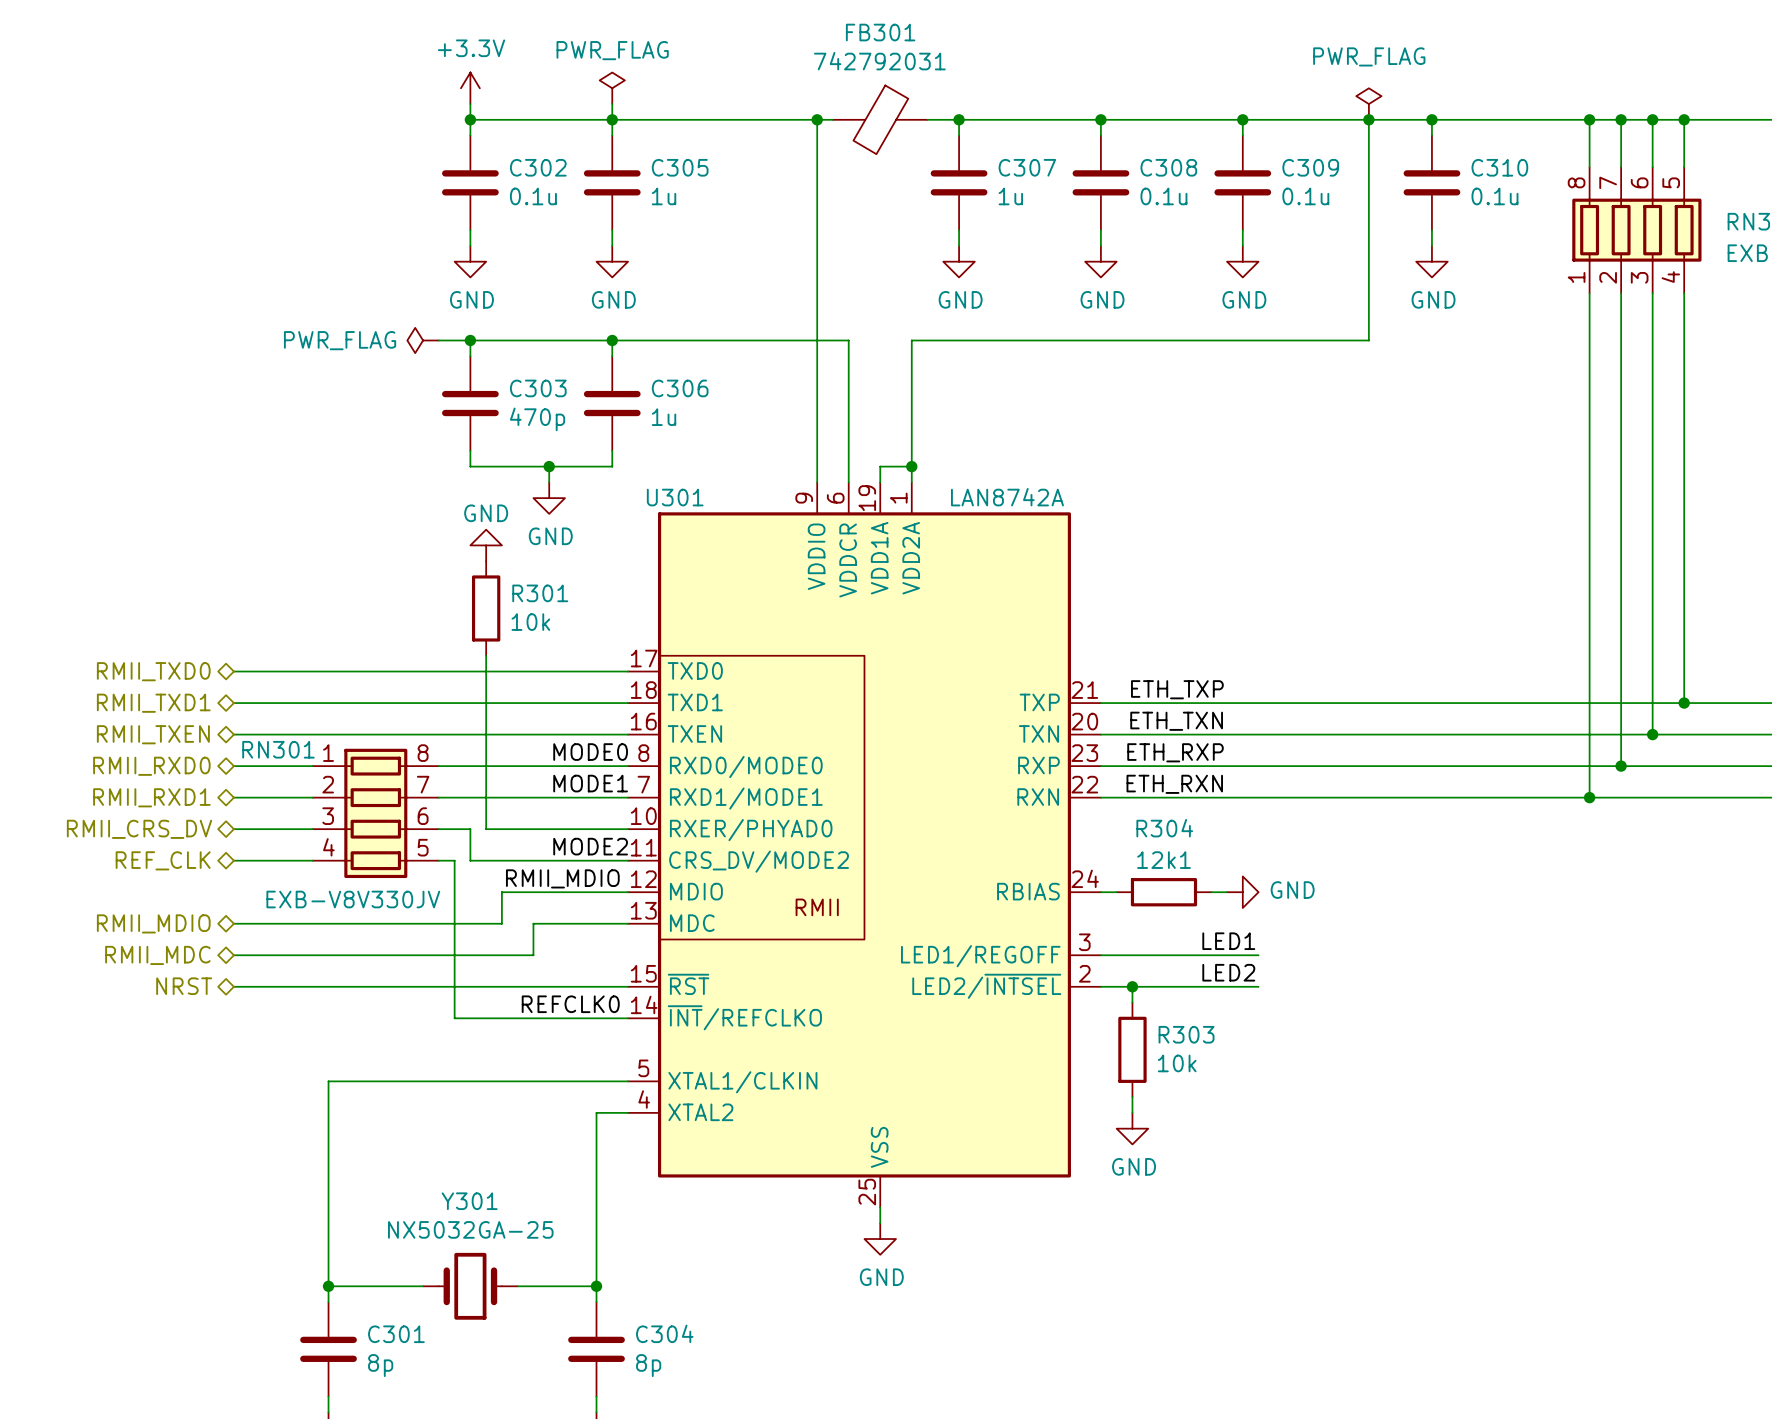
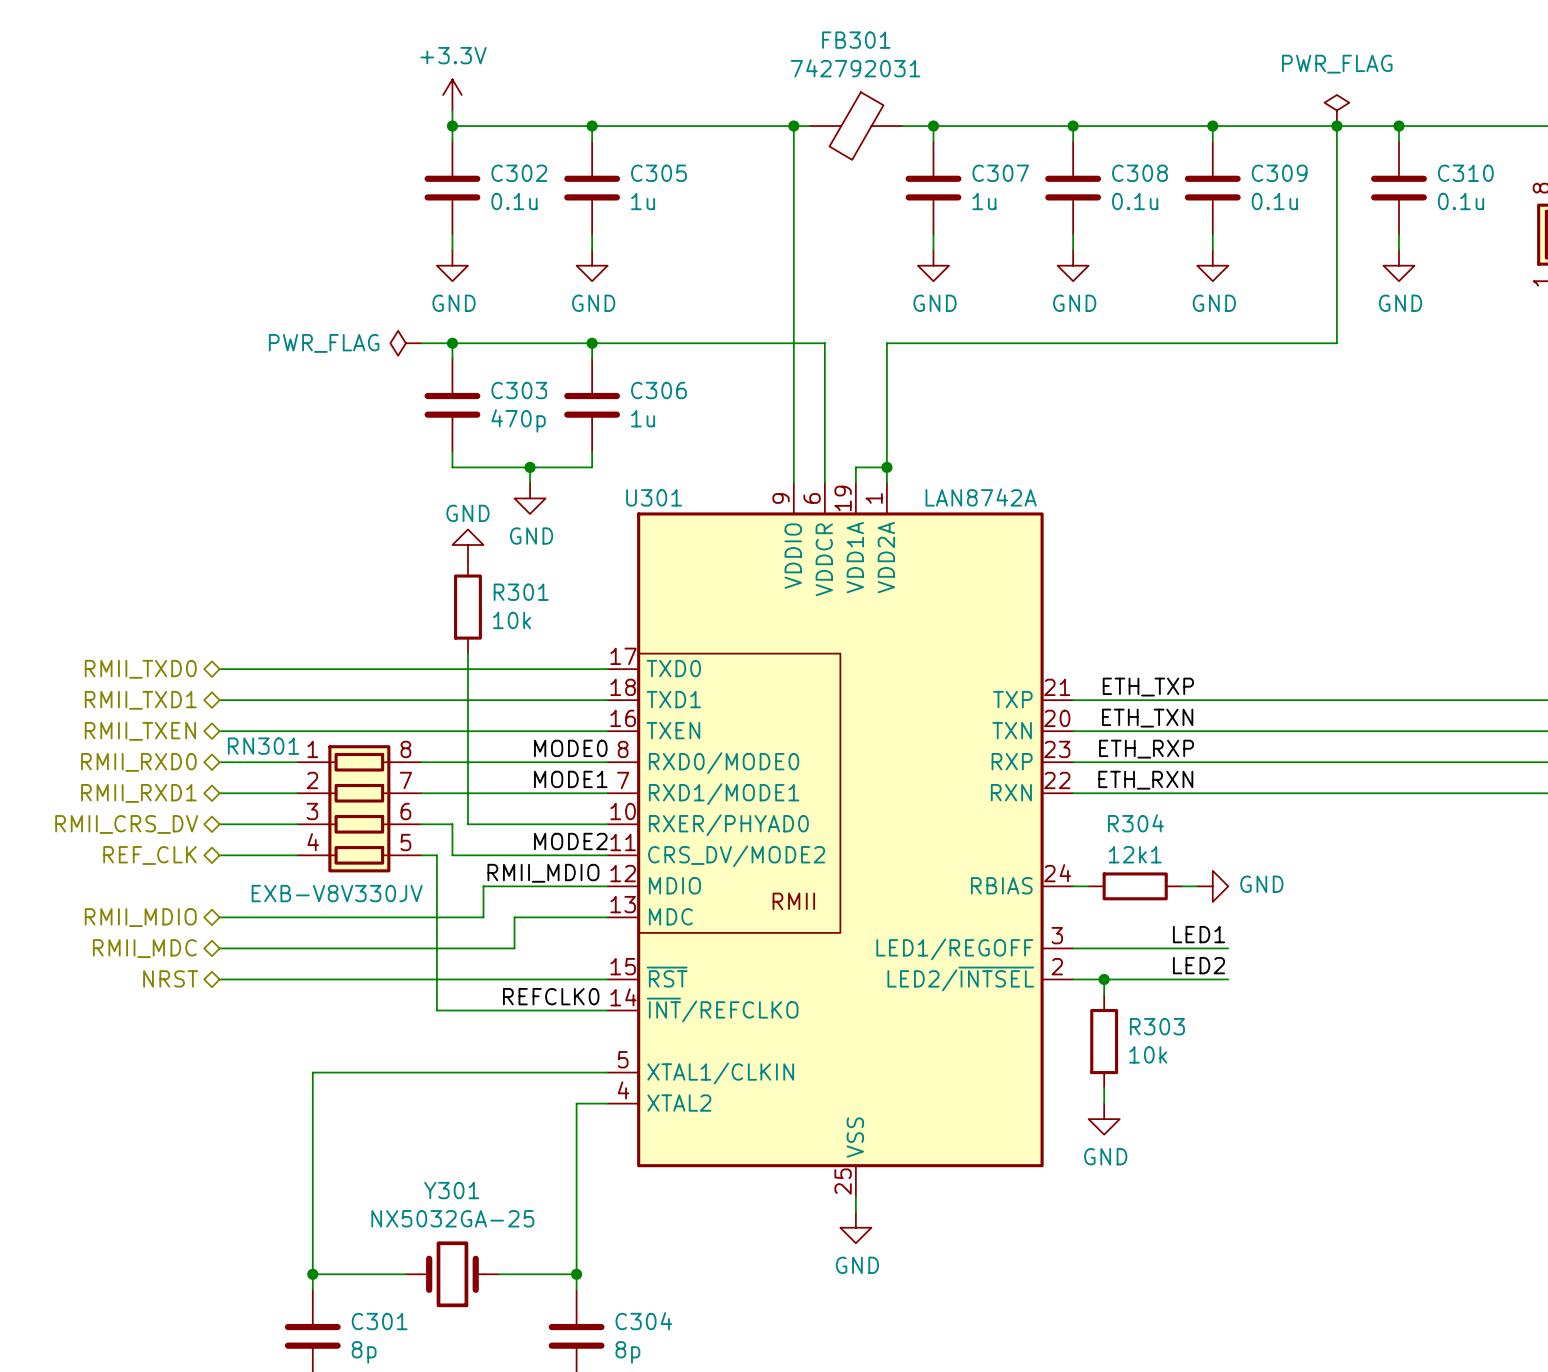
power symbol: PWR_FLAG (612, 88) -> none
wire: (612, 104) (612, 119) -> none

